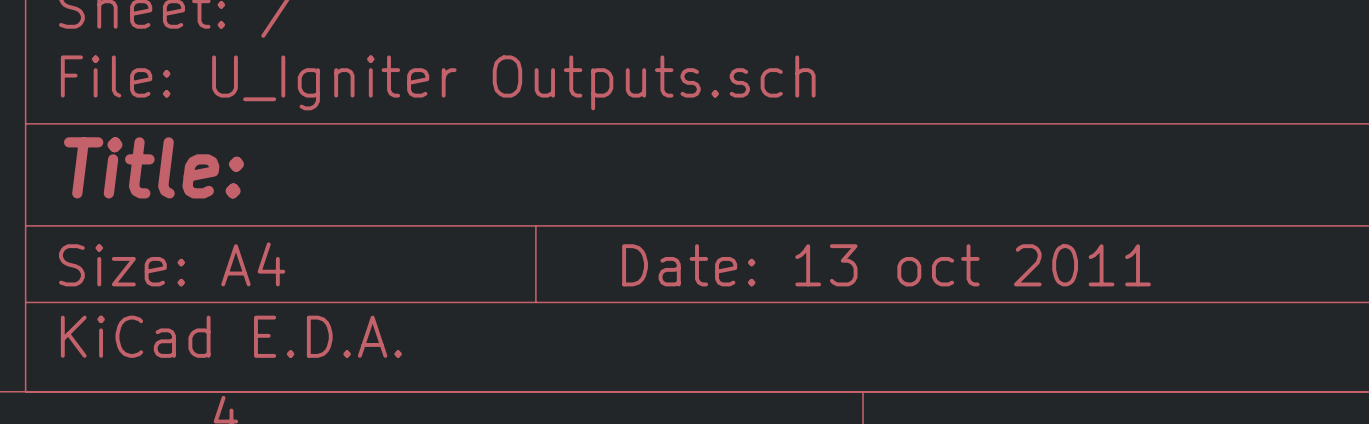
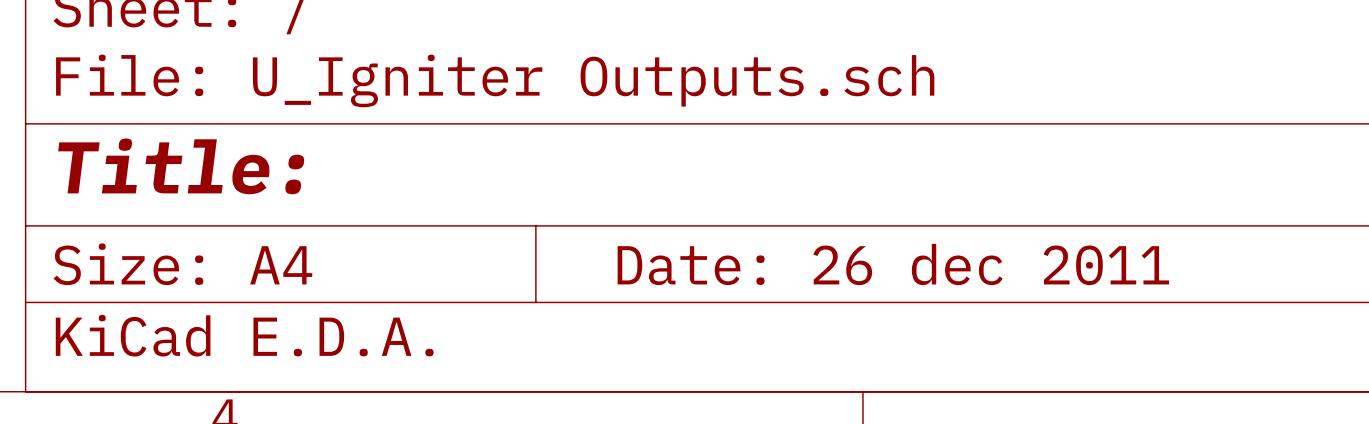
title block: Date: 13 oct 2011 (886, 265) -> Date: 26 dec 2011 (893, 264)

